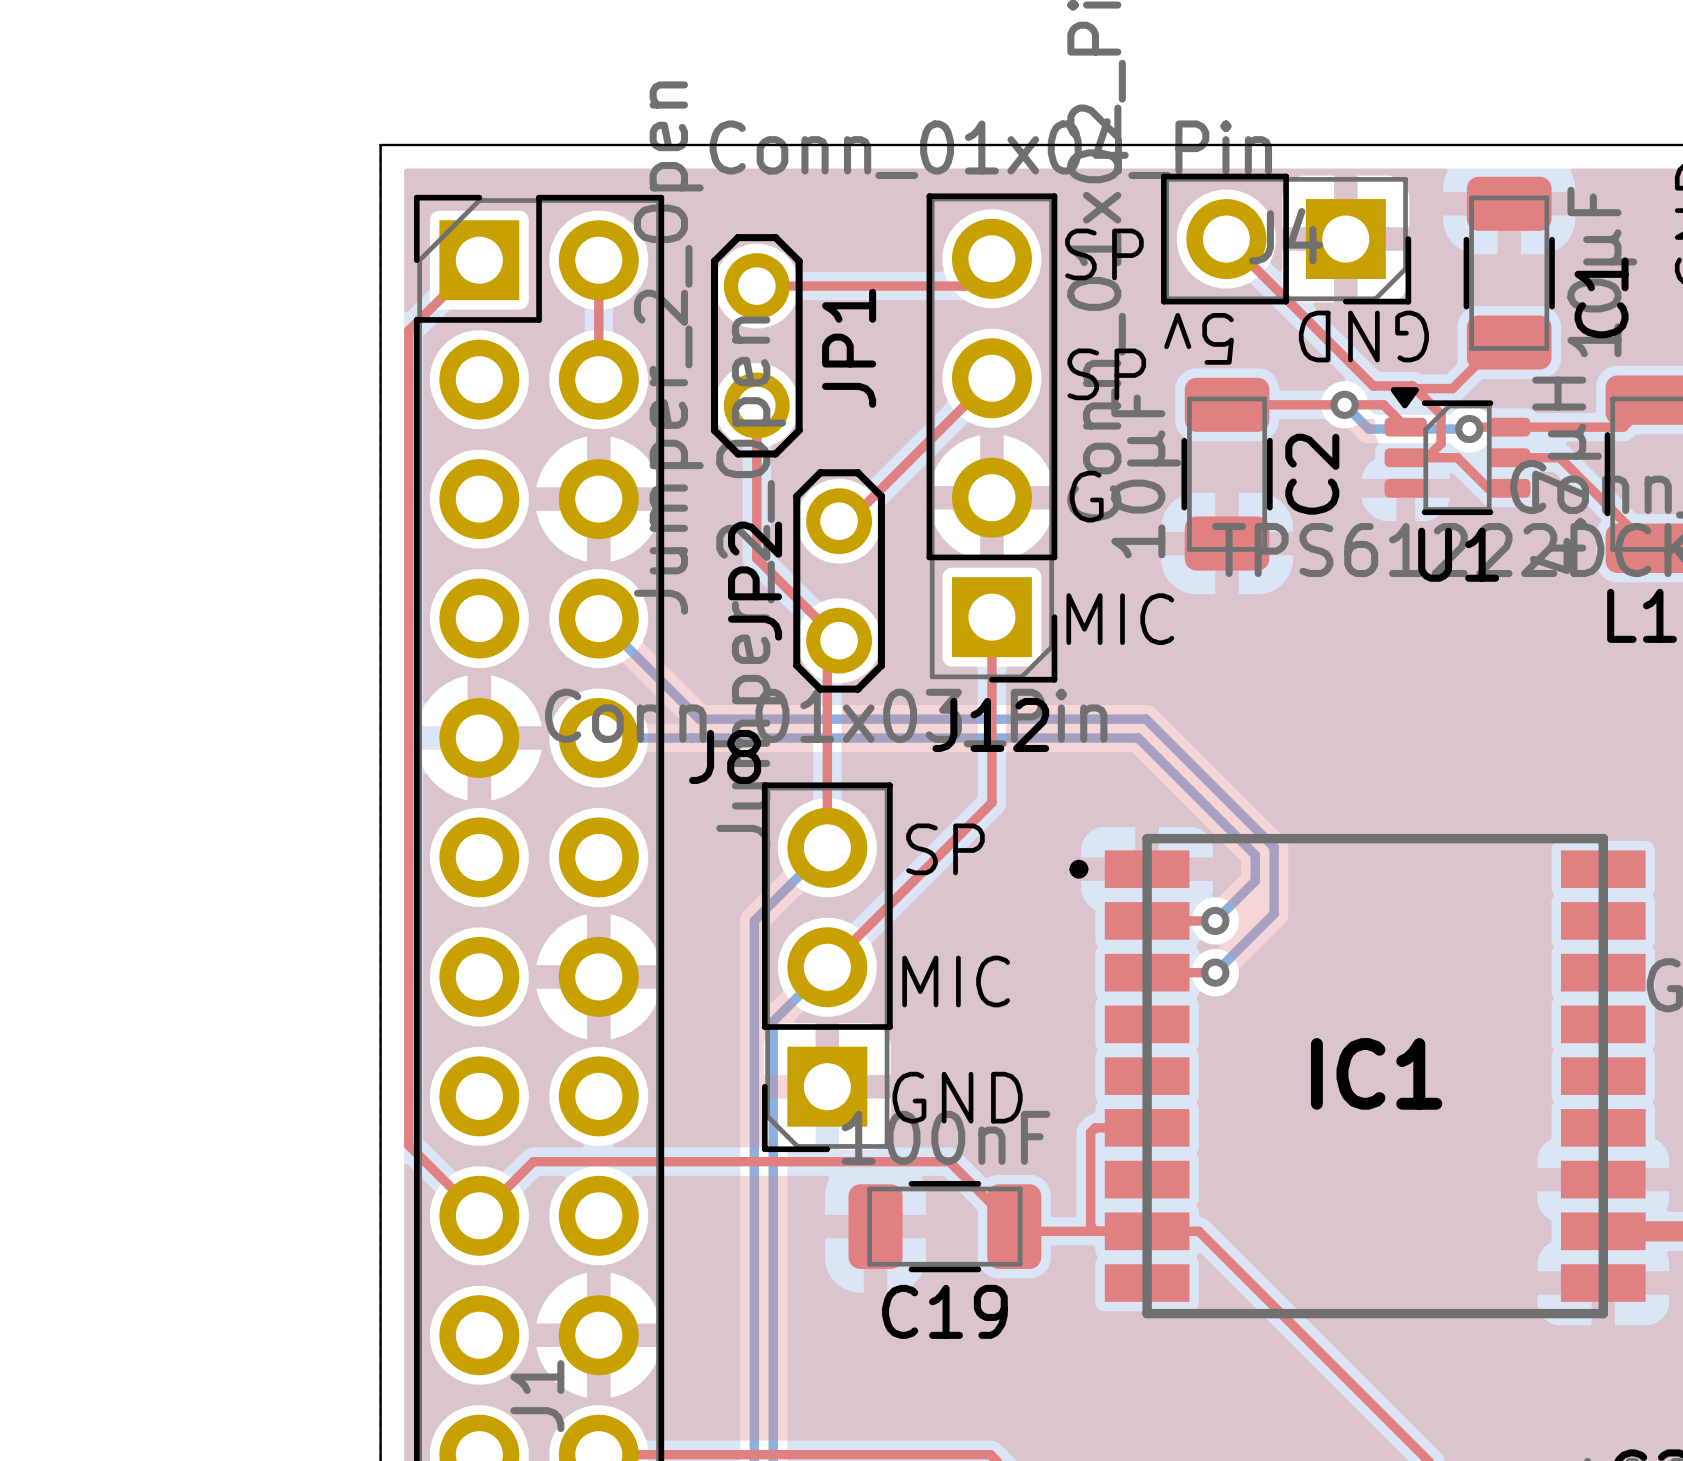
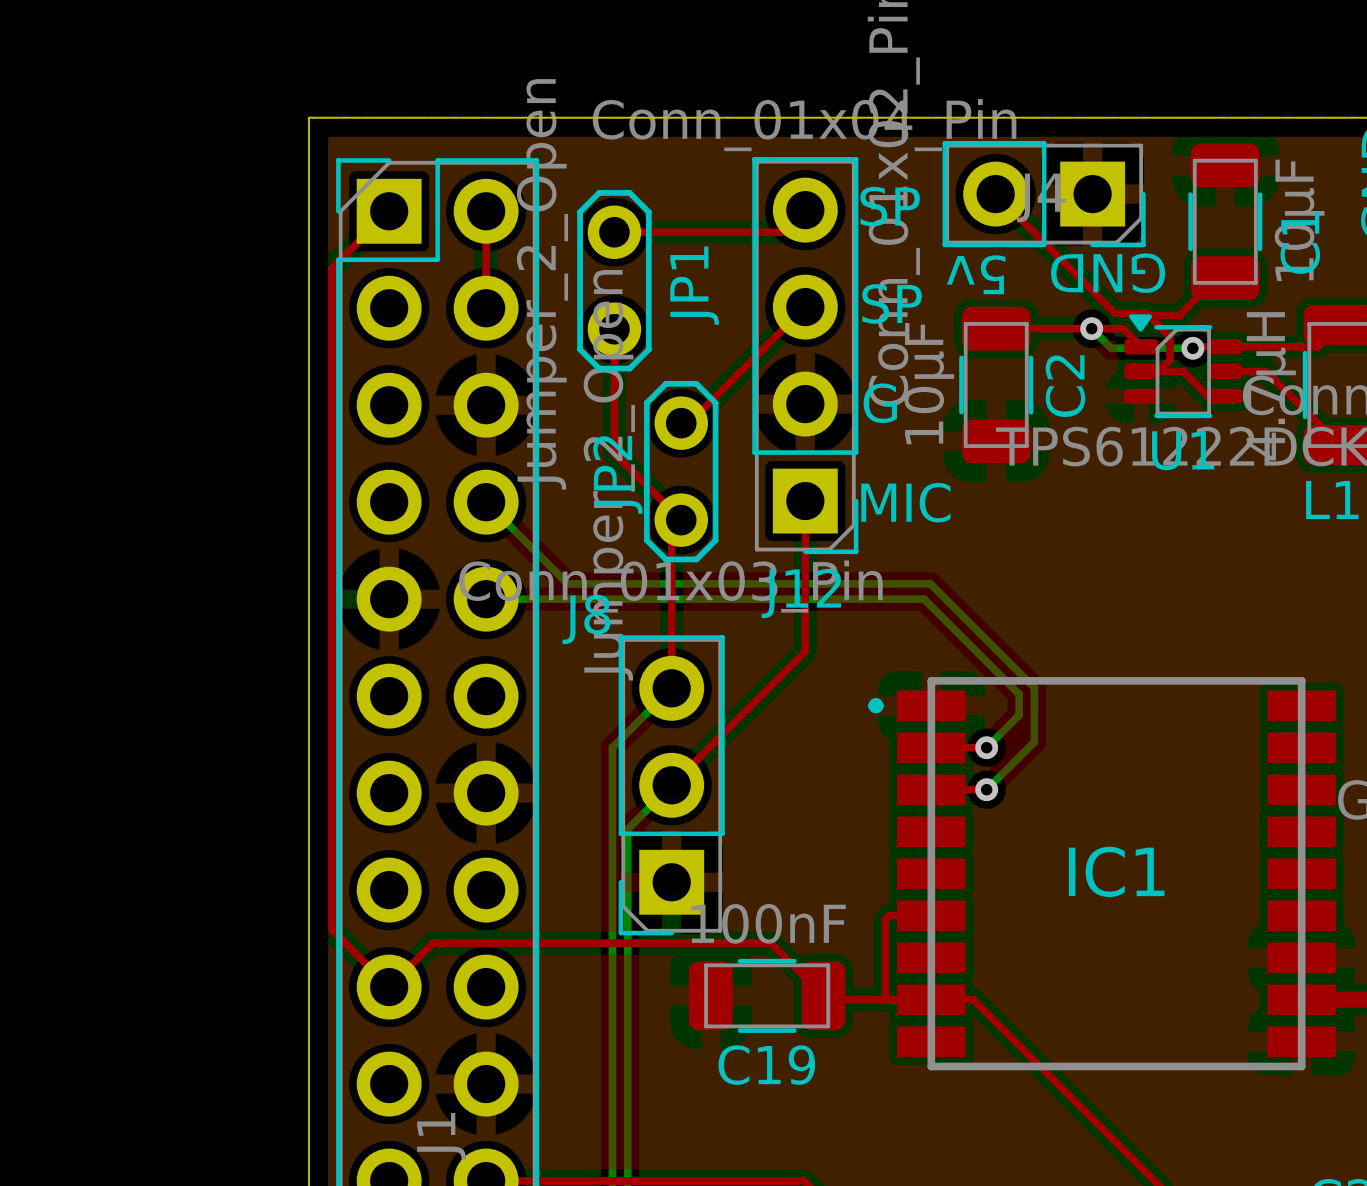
text: SP (945, 849) -> none
text: MIC (956, 981) -> none
text: GND (957, 1097) -> none

